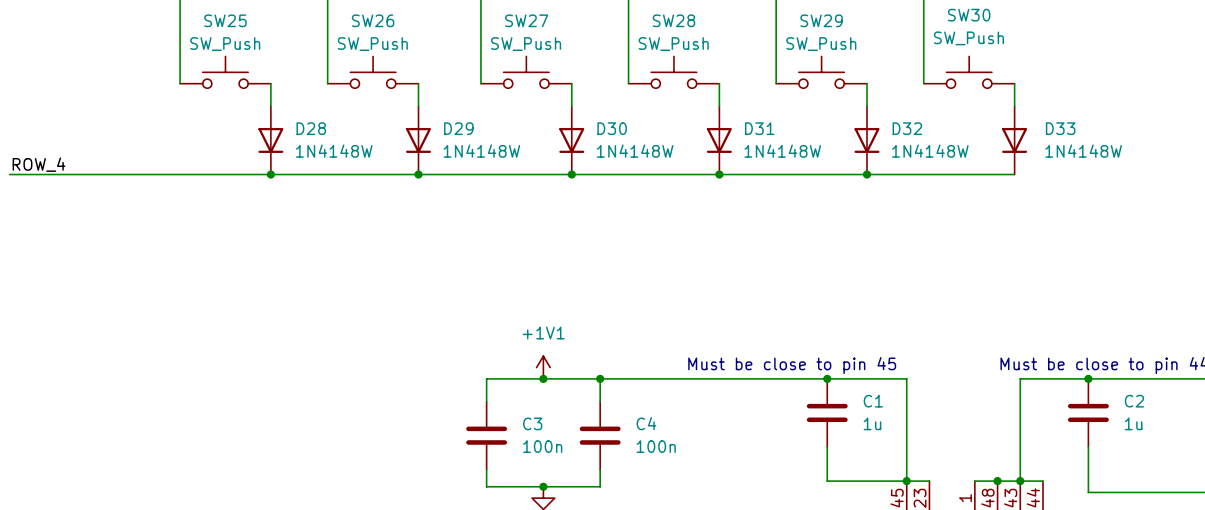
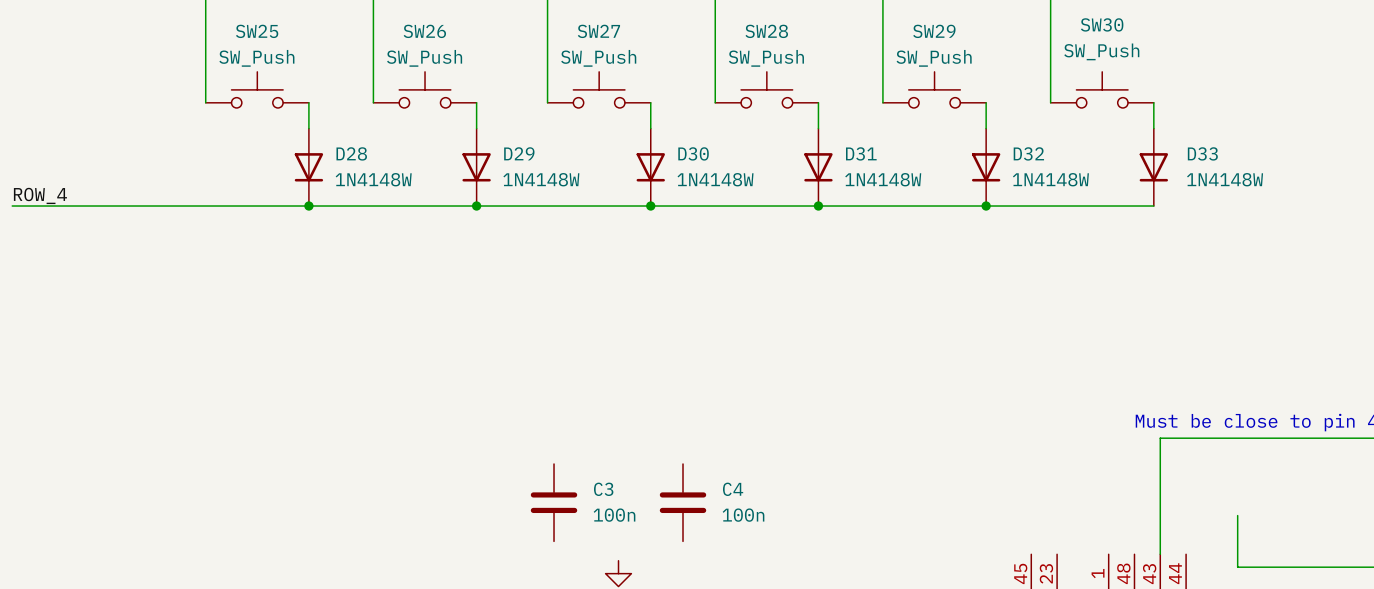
text: Must be close to pin 45 (792, 365) -> none
power symbol: +1V1 (543, 367) -> none
junction: (543, 378) -> none
wire: (600, 378) (600, 401) -> none
junction: (600, 378) -> none
junction: (827, 378) -> none
junction: (1088, 378) -> none
wire: (486, 401) (486, 378) (906, 378) (906, 481) -> none
C1: 1u (827, 412) -> none
C2: 1u (1088, 412) -> none
wire: (827, 447) (827, 481) (929, 481) -> none
wire: (486, 469) (486, 486) (600, 486) (600, 469) -> none
junction: (906, 481) -> none
wire: (974, 481) (1042, 481) -> none
junction: (997, 481) -> none
junction: (1020, 481) -> none
junction: (543, 486) -> none

